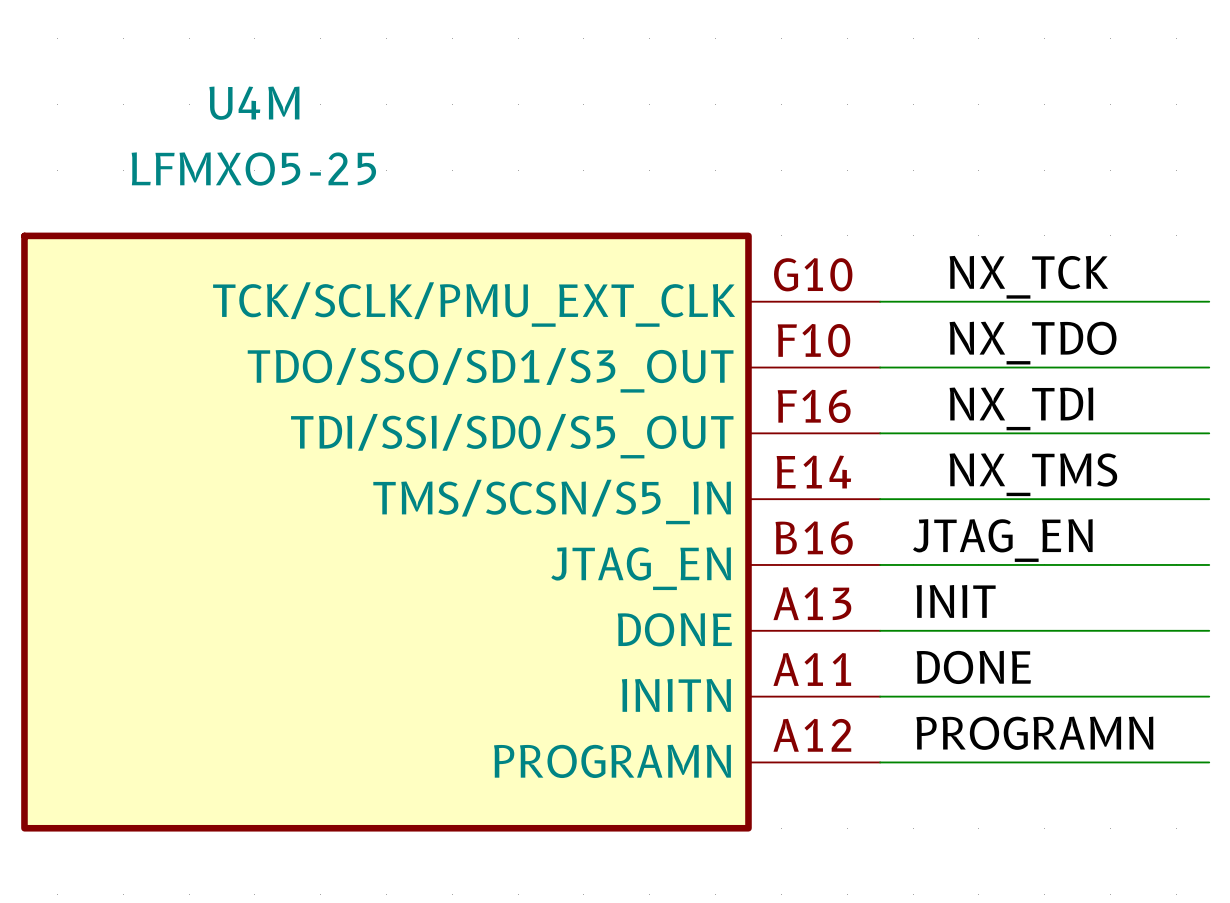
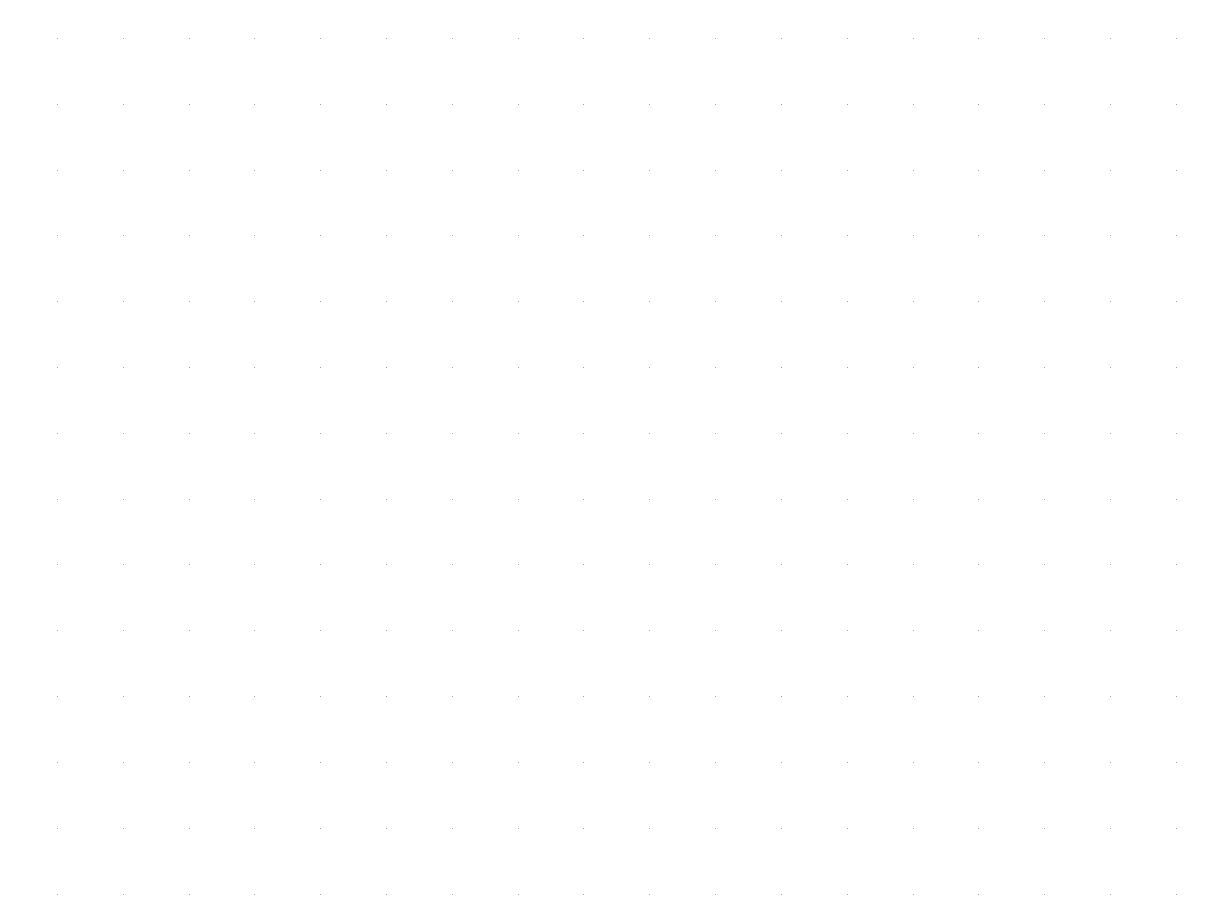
label: NX_TCK (1028, 277) -> none
wire: (880, 301) (1209, 301) -> none
label: NX_TDO (1033, 343) -> none
wire: (880, 367) (1209, 367) -> none
label: NX_TDI (1021, 408) -> none
wire: (880, 433) (1209, 433) -> none
label: NX_TMS (1033, 474) -> none
wire: (880, 499) (1209, 499) -> none
U4M: LFMXO5-25 (450, 532) -> none
label: JTAG_EN (1002, 540) -> none
wire: (880, 564) (1209, 564) -> none
label: INIT (956, 601) -> none
wire: (880, 630) (1209, 630) -> none
label: DONE (973, 667) -> none
wire: (880, 696) (1209, 696) -> none
label: PROGRAMN (1034, 733) -> none
wire: (880, 762) (1209, 762) -> none

